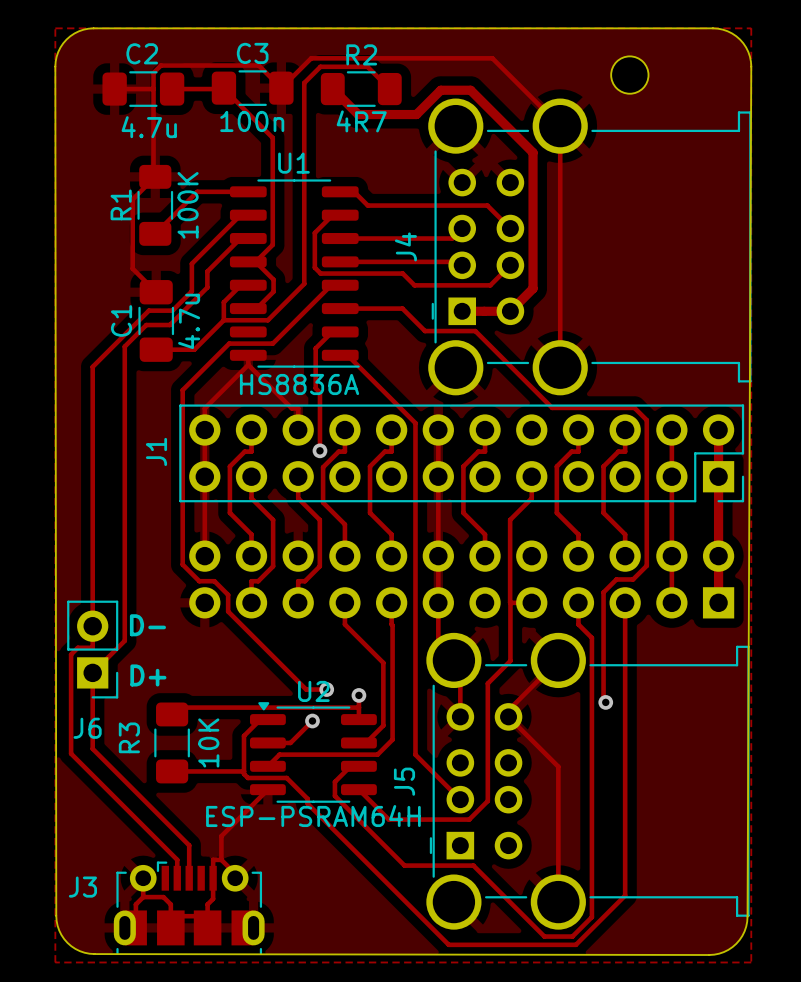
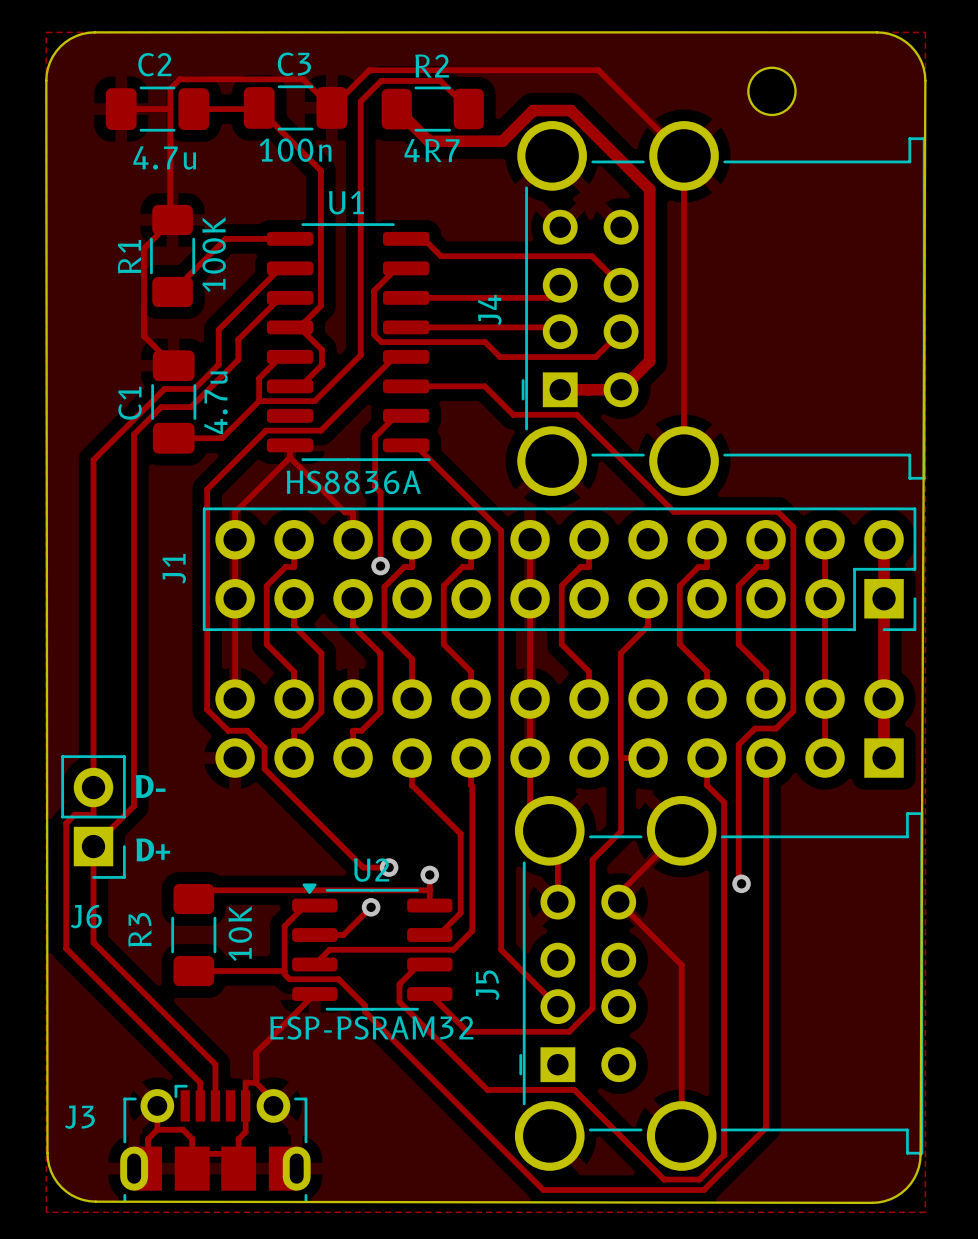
U2 value: ESP-PSRAM64H (313, 816) -> ESP-PSRAM32 (371, 1028)

